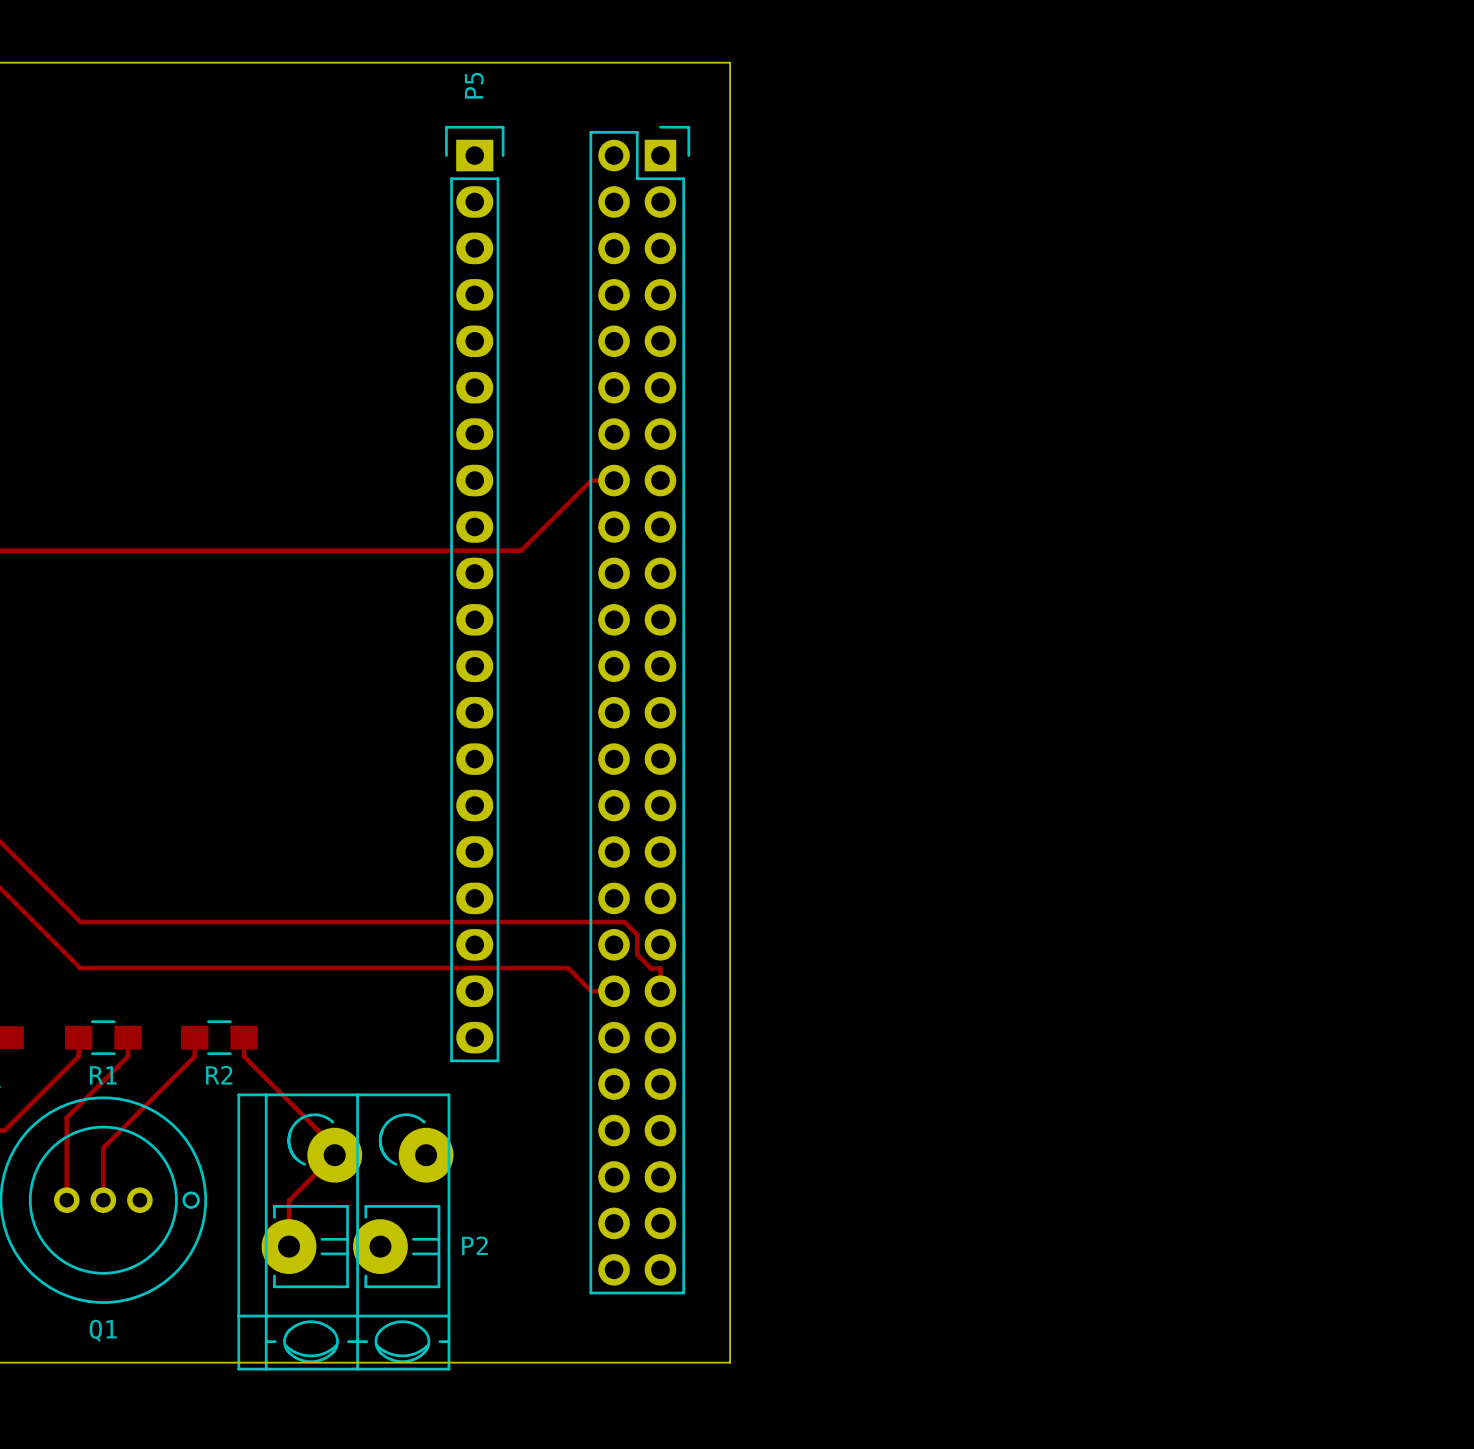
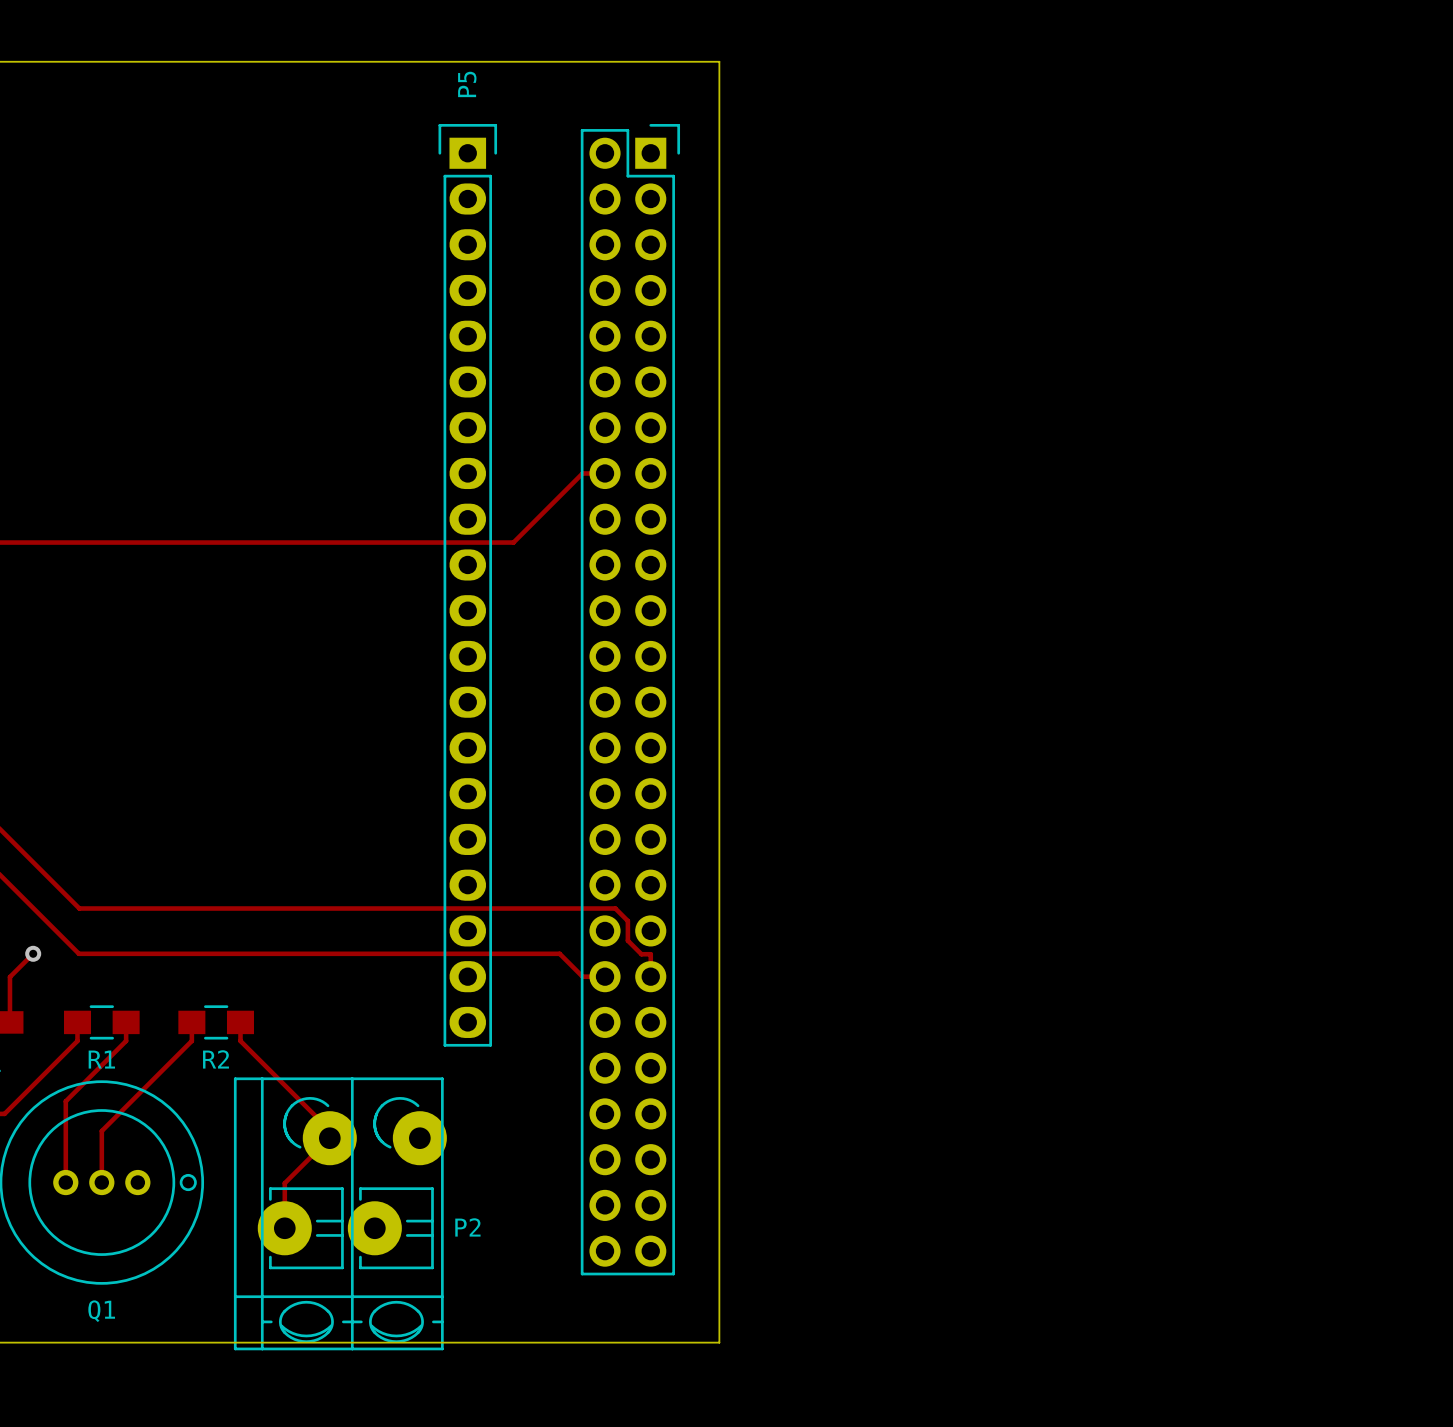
track: none -> (33, 953) (9, 977) (9, 1022)
via: none -> (33, 953)

